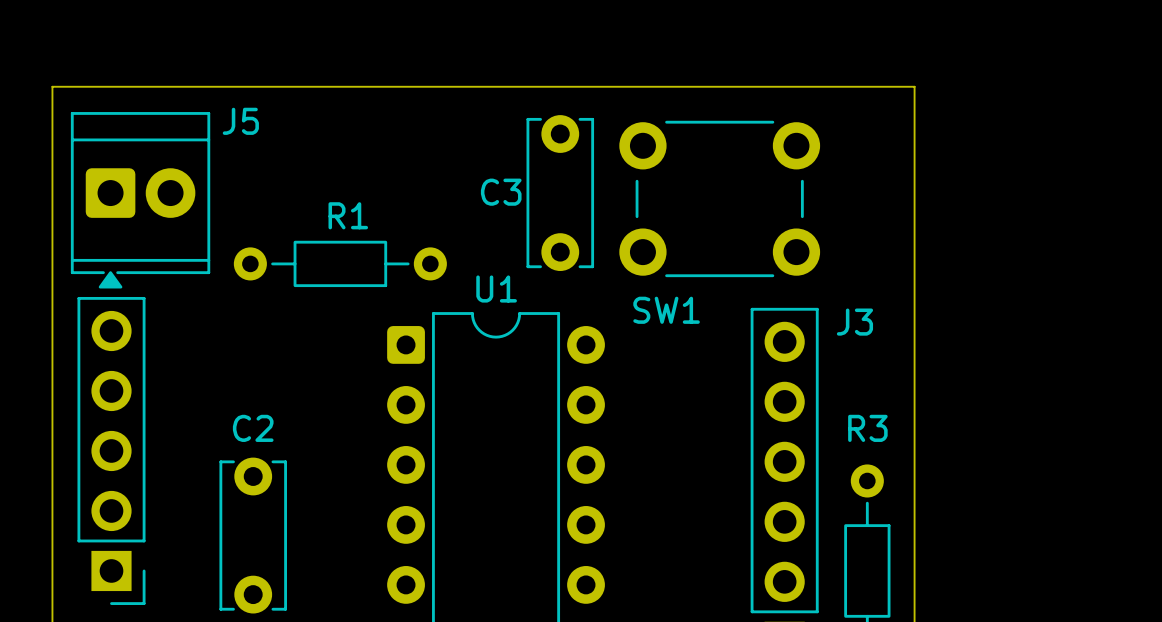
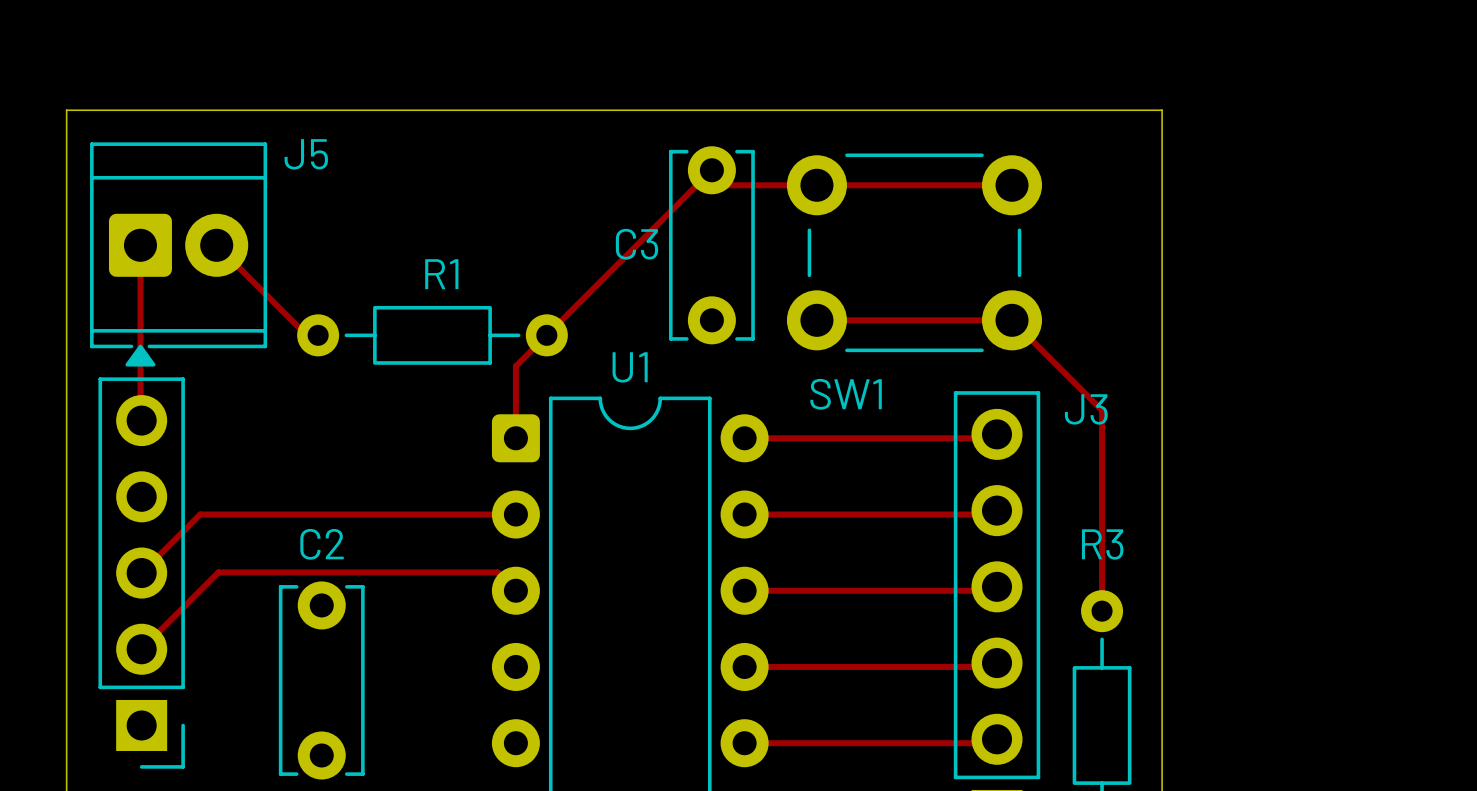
track: none -> (1012, 185) (726, 185) (711, 170) (515, 366) (515, 438)
track: none -> (140, 245) (141, 420)
track: none -> (216, 245) (306, 335) (318, 335)
track: none -> (816, 320) (1012, 320) (1102, 410) (1102, 611)
track: none -> (997, 434) (993, 438) (744, 438)
track: none -> (997, 510) (993, 514) (744, 514)
track: none -> (515, 514) (200, 514) (141, 573)
track: none -> (997, 586) (993, 590) (744, 590)
track: none -> (515, 590) (497, 572) (218, 572) (141, 649)
track: none -> (997, 663) (993, 666) (744, 666)
track: none -> (997, 739) (993, 743) (744, 743)

